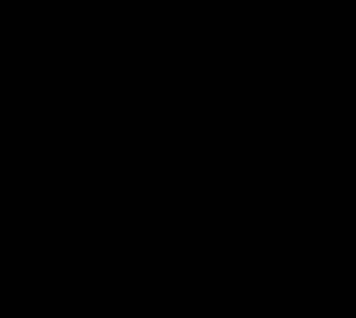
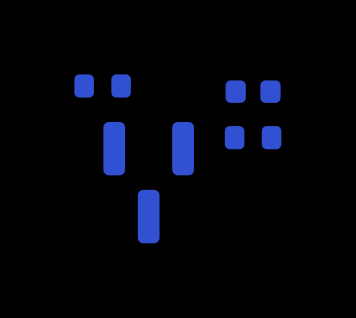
part: none -> (102, 85)
part: none -> (253, 91)
part: none -> (253, 137)
part: none -> (148, 182)

